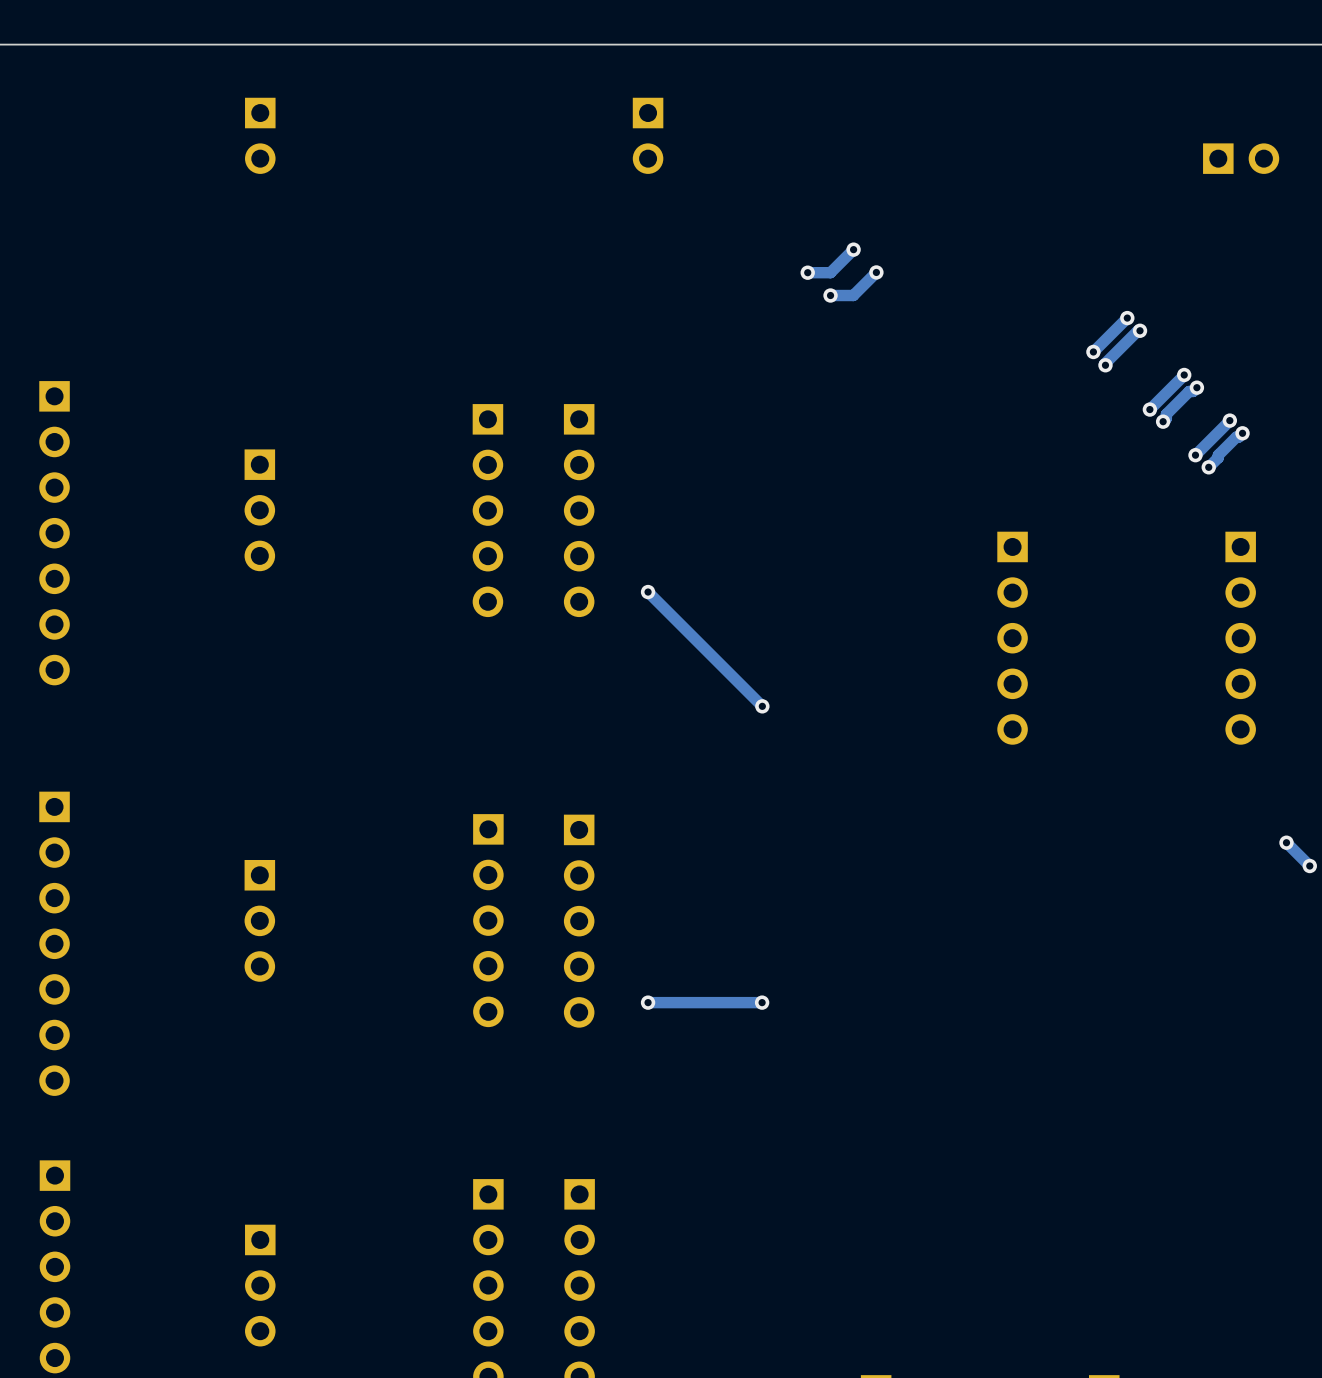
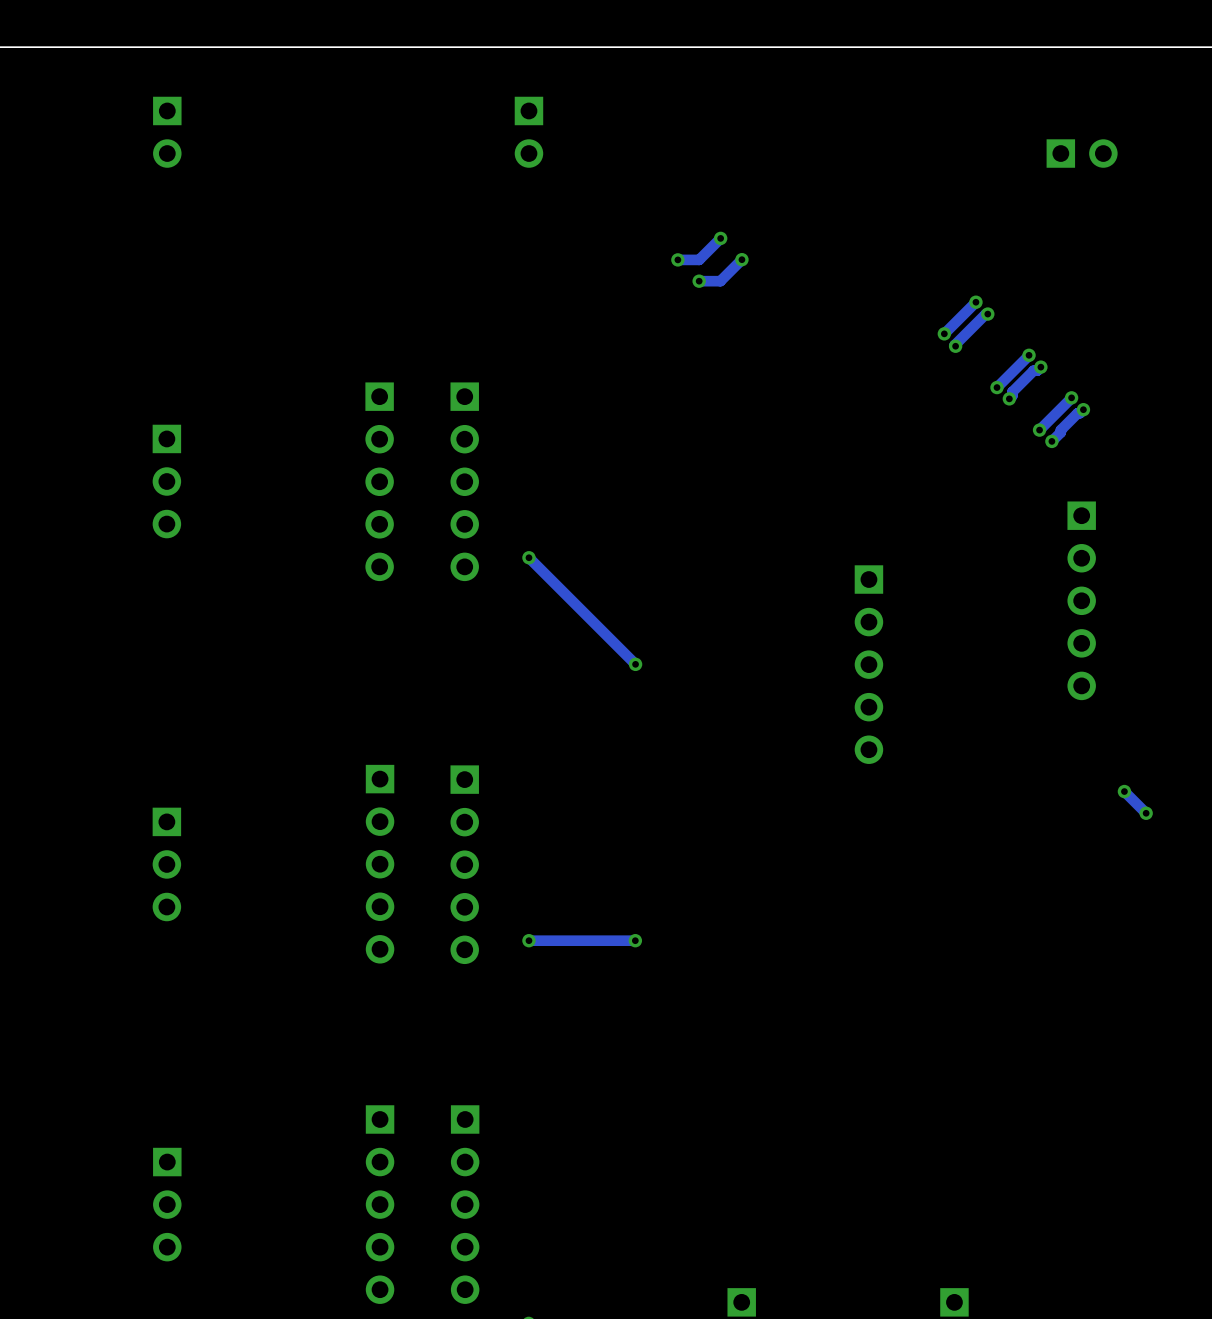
part position: (1012, 638) -> (868, 664)

